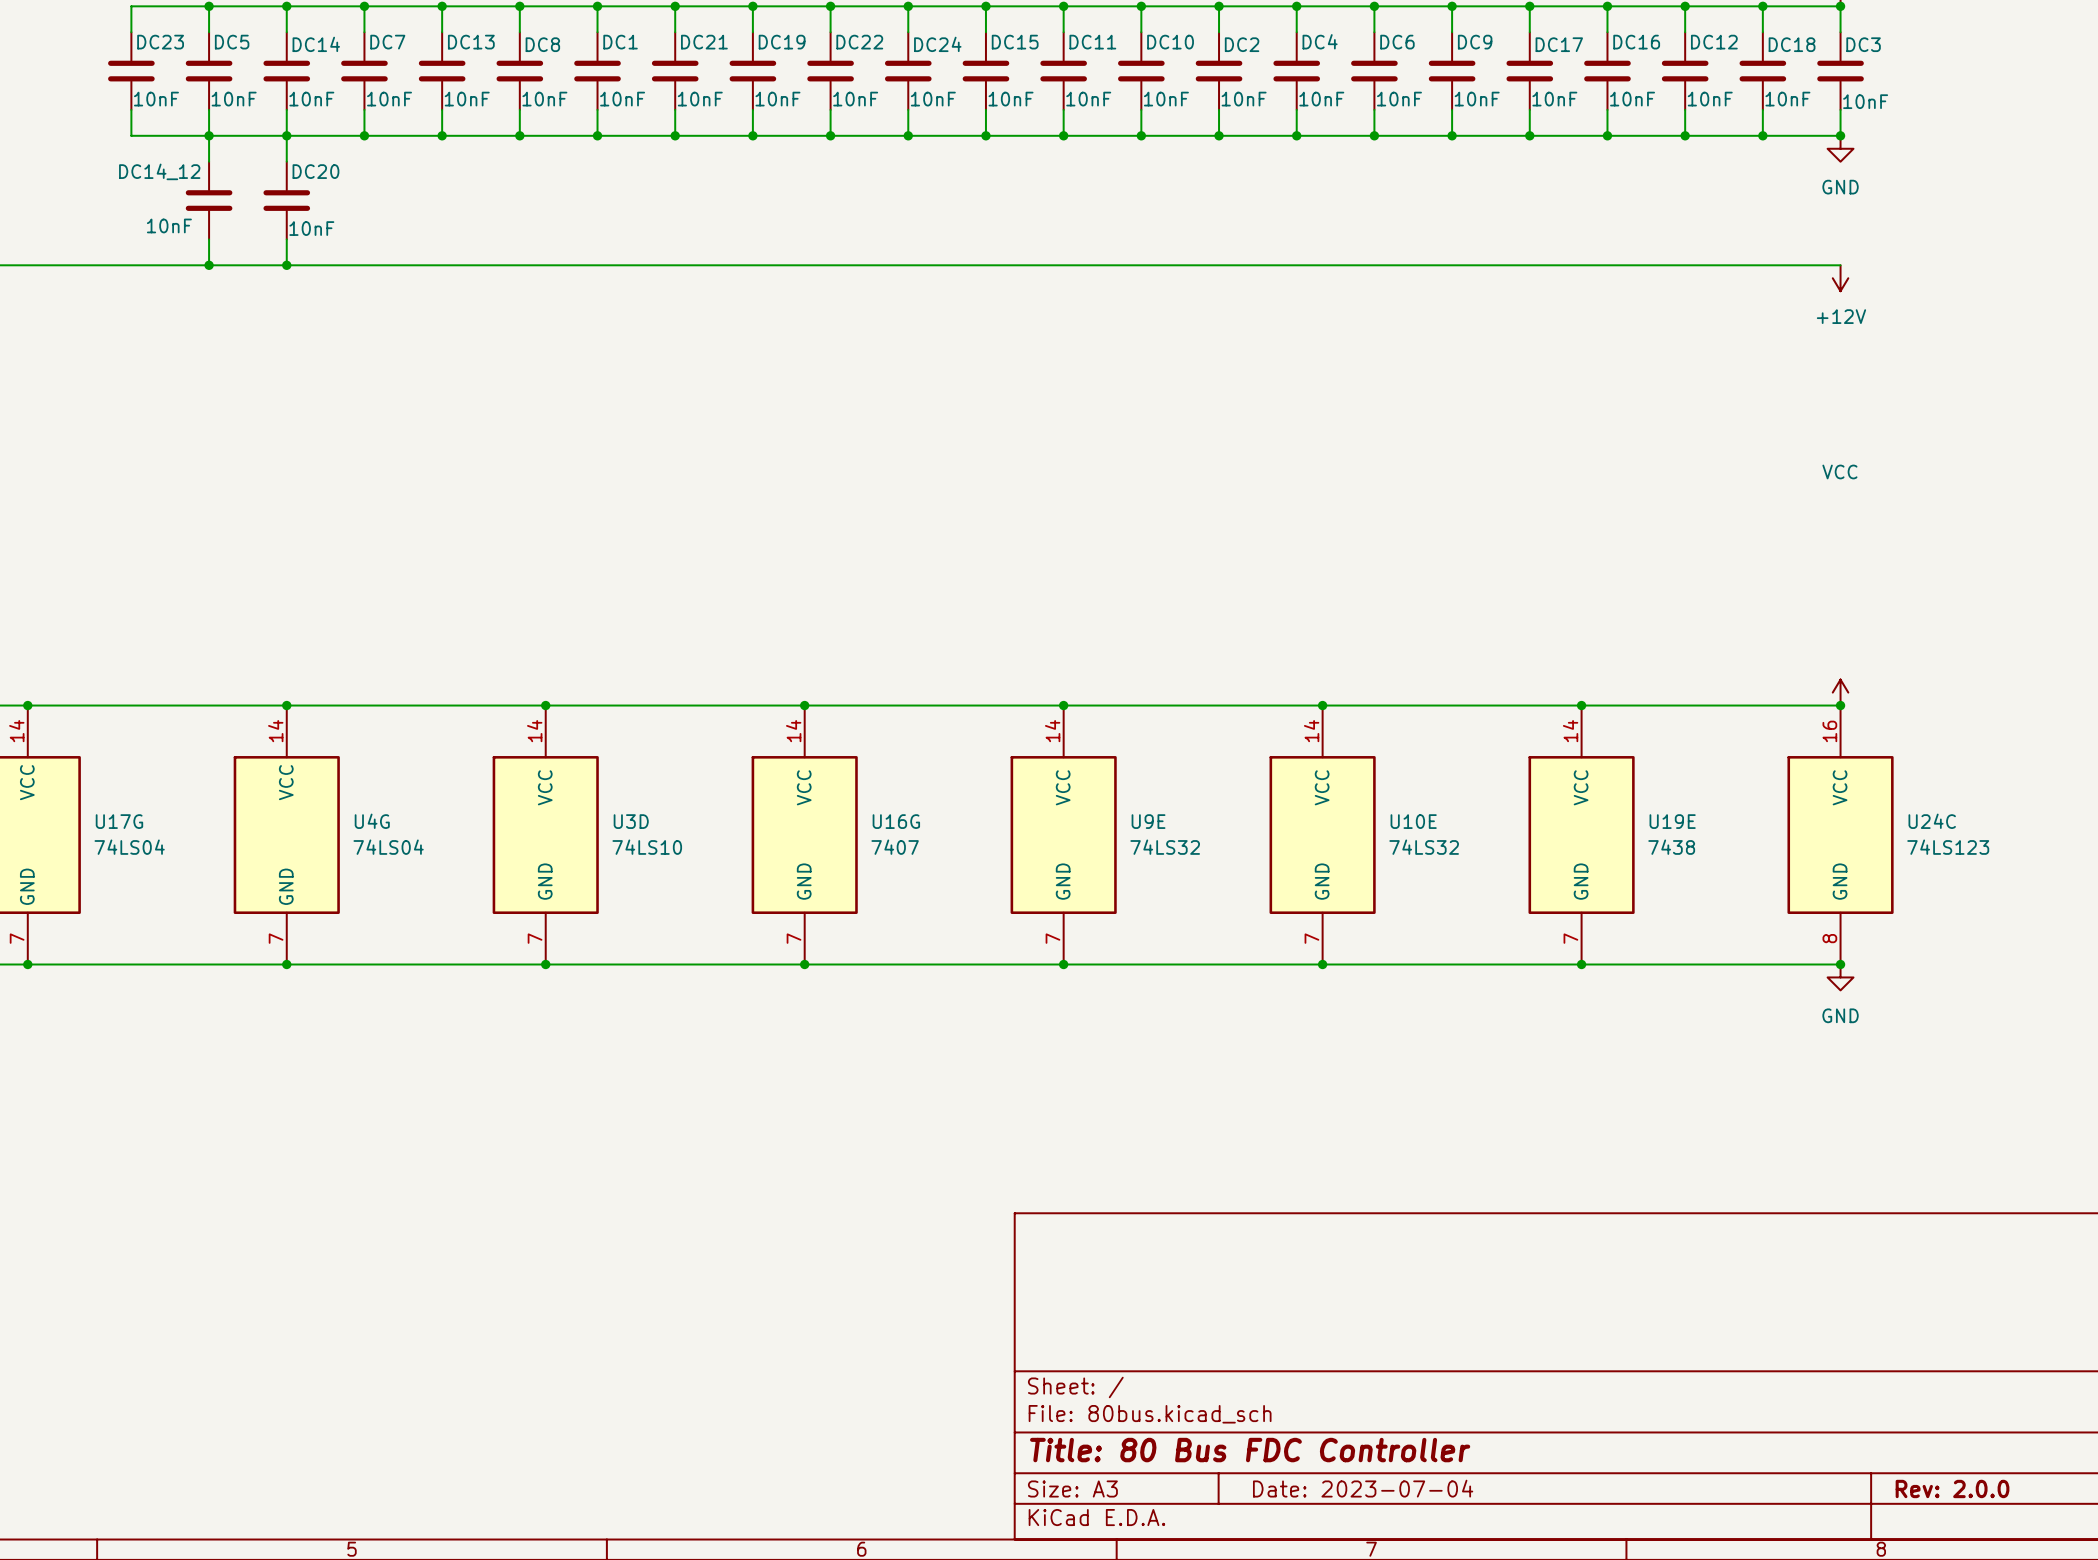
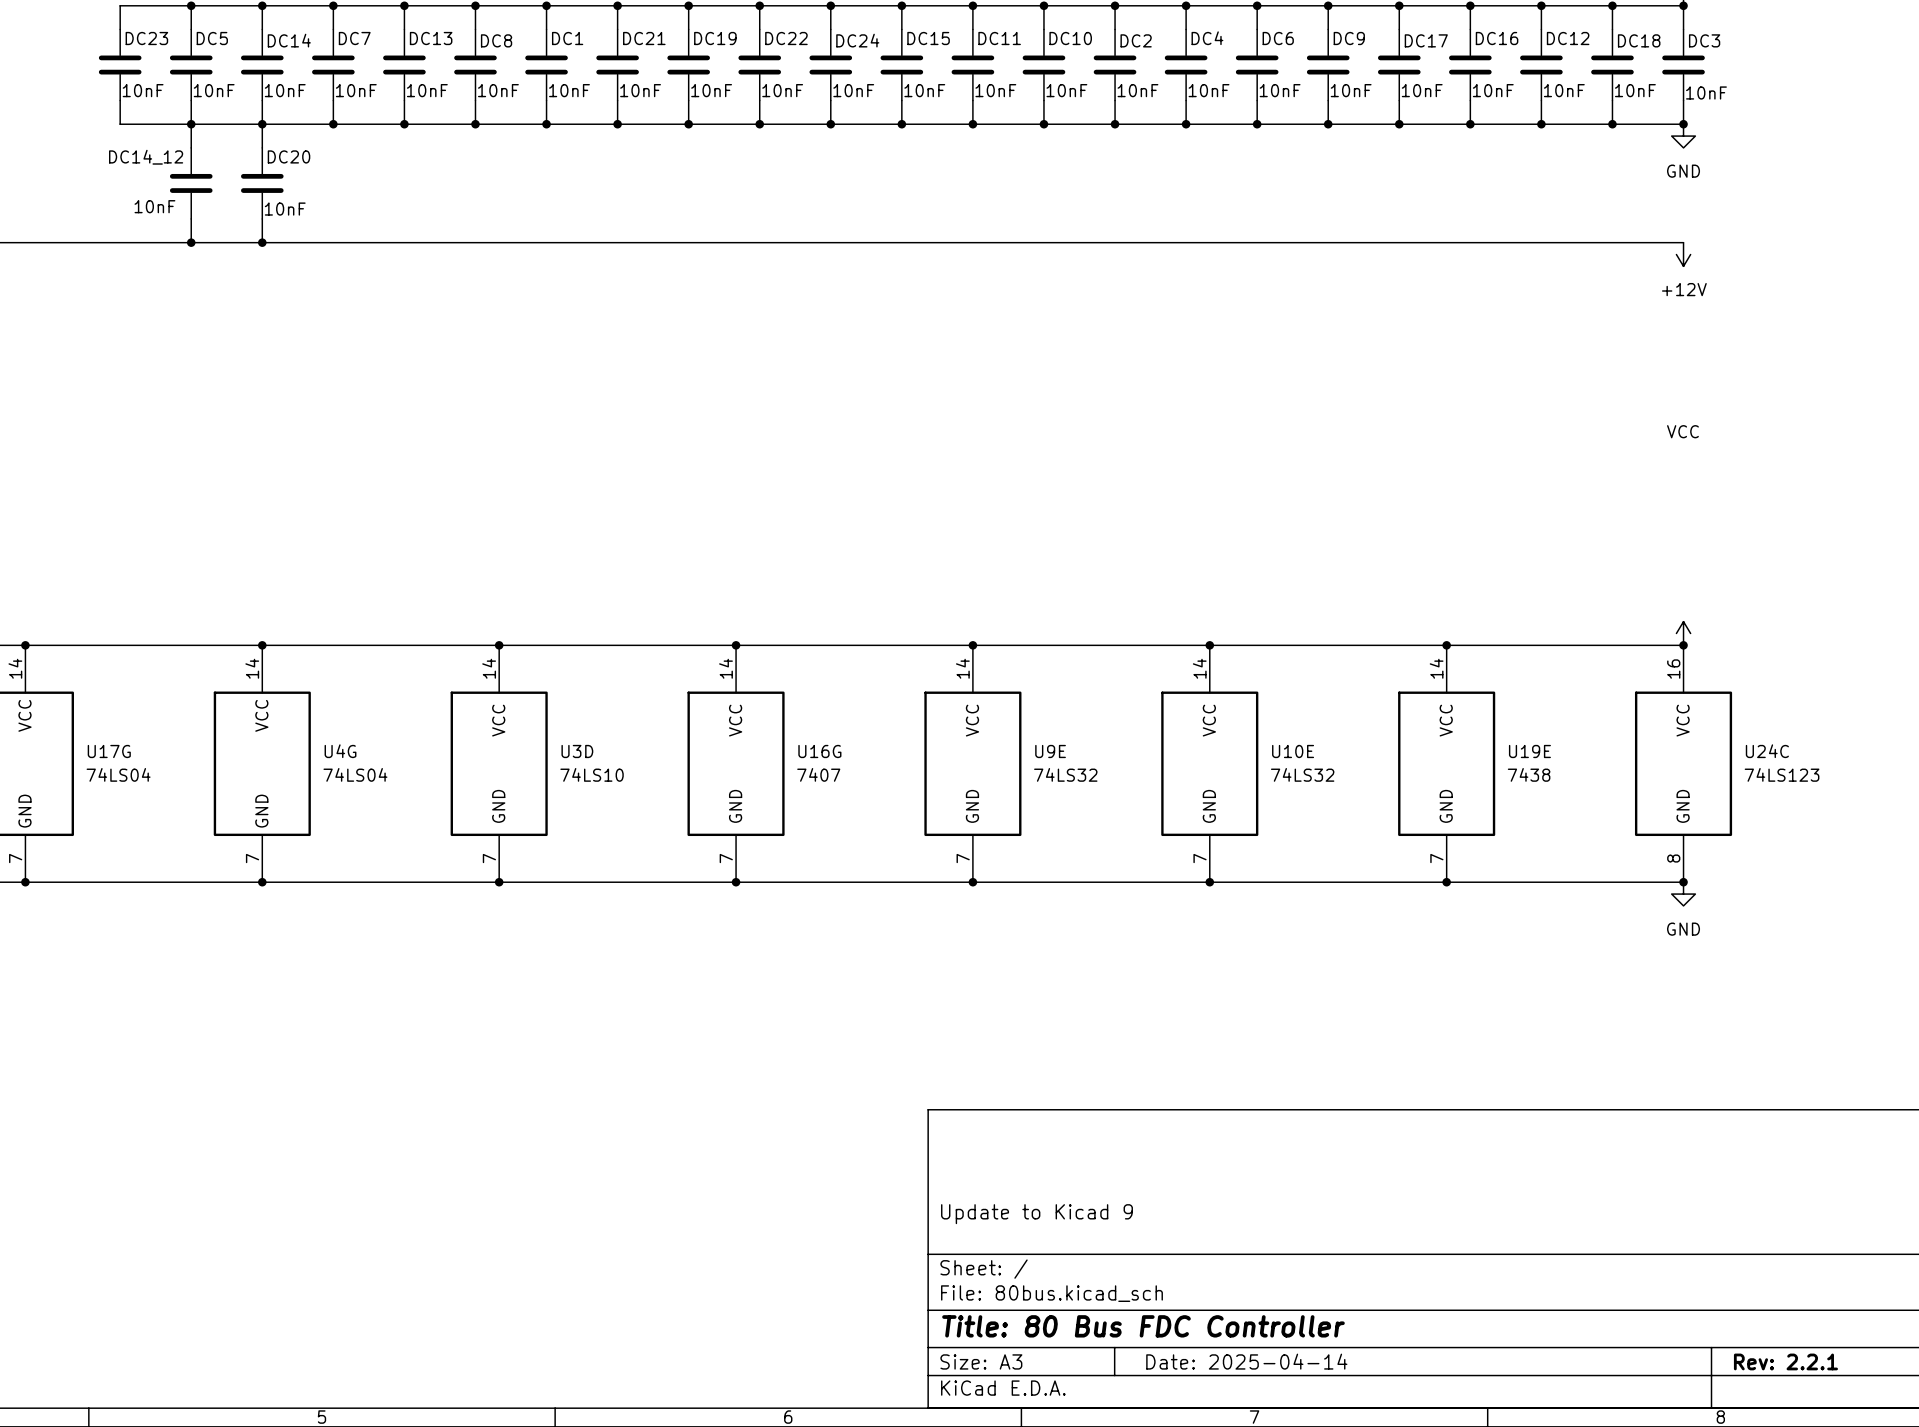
title block: none -> Update to Kicad 9 (1036, 1214)
title block: Date: 2023-07-04 (1363, 1488) -> Date: 2025-04-14 (1246, 1361)
title block: Rev: 2.0.0 (1952, 1488) -> Rev: 2.2.1 (1785, 1361)

